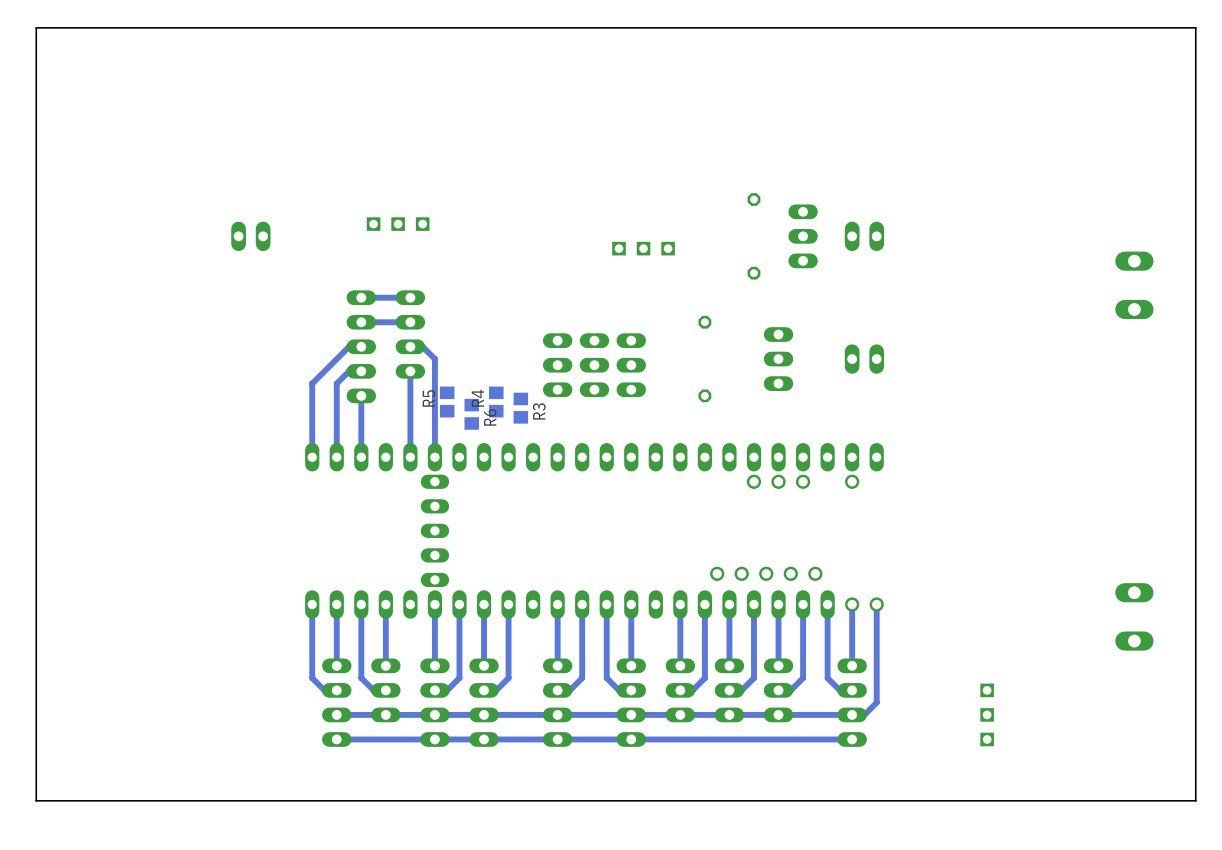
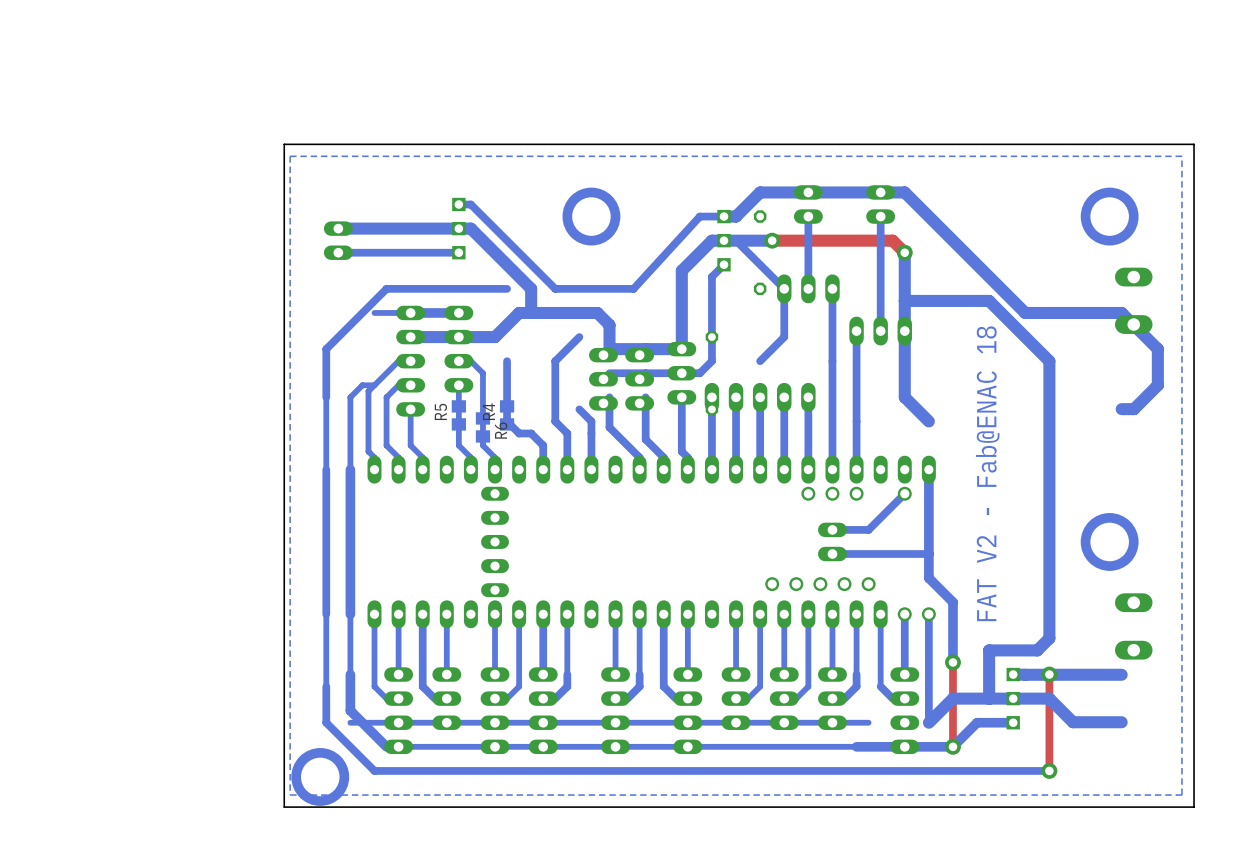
board edge: (1195, 126) (1195, 27) (36, 27) (36, 800) (269, 800) -> (1194, 144) (284, 144) (284, 807)
bottom zone outline: none -> (1181, 156) (290, 156) (290, 795) (1181, 795) (1181, 156)
drawing: none -> [562, 187, 621, 246]
drawing: none -> [1080, 187, 1139, 246]
bottom track: none -> (458, 204) (470, 204) (555, 288) (633, 288) (699, 216) (736, 216) (760, 192) (904, 192) (1025, 312) (1121, 312) (1157, 349) (1157, 385) (1134, 409) (1121, 409)
part: none -> (808, 204)
part: none -> (880, 204)
bottom track: none -> (808, 216) (808, 288)
bottom track: none -> (880, 216) (880, 331)
bottom track: none -> (338, 228) (470, 228) (531, 288) (531, 312)
part rotation: 0° (398, 224) -> 90° clockwise (458, 228)
part position: (398, 224) -> (458, 228)
bottom track: none -> (724, 240) (736, 240) (784, 288) (784, 337) (760, 361)
bottom track: none -> (772, 240) (711, 240) (681, 270) (681, 349) (609, 349) (609, 325) (597, 312) (519, 312) (495, 337) (422, 337)
top track: none -> (772, 240) (892, 240) (904, 252)
via: none -> (772, 240)
part rotation: 0° (250, 236) -> 90° clockwise (338, 240)
part position: (250, 236) -> (338, 240)
bottom track: none -> (458, 252) (338, 252)
part rotation: 0° (803, 236) -> 90° clockwise (808, 288)
part: (864, 236) -> none
bottom track: none -> (904, 252) (904, 397) (928, 421)
via: none -> (904, 252)
part rotation: 0° (643, 248) -> 90° clockwise (724, 240)
part position: (643, 248) -> (724, 240)
bottom track: none -> (724, 264) (711, 276) (711, 361) (699, 373) (609, 373)
bottom track: none -> (832, 288) (832, 469)
bottom track: none -> (904, 300) (989, 300) (1049, 361) (1049, 638) (1037, 650) (989, 650) (989, 698)
bottom track: none -> (856, 331) (856, 469)
part: none -> (880, 331)
bottom track: (398, 322) (361, 322) -> (458, 312) (422, 312)
bottom track: none -> (579, 337) (555, 361) (555, 421) (567, 433) (567, 469)
part position: (410, 334) -> (458, 349)
bottom track: (361, 346) (349, 346) (312, 383) -> (507, 288) (386, 288) (326, 349) (326, 397)
part position: (361, 346) -> (410, 361)
bottom track: (410, 346) (422, 346) (434, 359) (434, 457) -> none
bottom track: none -> (458, 361) (470, 361) (482, 373) (482, 445) (495, 457) (495, 469)
bottom track: none -> (507, 361) (507, 421) (519, 433) (531, 433) (543, 445) (543, 469)
part: none -> (681, 373)
part: (778, 359) -> none
part: (864, 359) -> none
part: (557, 365) -> none
bottom track: none -> (410, 385) (398, 385) (386, 397) (386, 445) (398, 457) (398, 469)
bottom track: (410, 371) (410, 444) -> (410, 409) (410, 445) (422, 457)
bottom track: none -> (458, 385) (458, 445) (470, 457) (470, 469)
bottom track: none -> (609, 397) (609, 427) (639, 457) (639, 469)
bottom track: none -> (645, 397) (645, 439) (663, 457) (663, 469)
bottom track: none -> (681, 397) (681, 451) (687, 457) (687, 469)
bottom track: none -> (711, 397) (711, 469)
bottom track: none -> (736, 397) (736, 469)
bottom track: none -> (760, 397) (760, 469)
part: none -> (760, 397)
bottom track: none -> (784, 397) (784, 469)
bottom track: none -> (808, 397) (808, 469)
bottom track: (361, 395) (361, 444) -> (410, 361) (398, 361) (368, 391) (368, 451) (374, 457)
bottom track: none -> (579, 409) (591, 421) (591, 469)
R3: (520, 408) -> none
bottom track: none -> (326, 469) (326, 614)
bottom track: none -> (350, 469) (350, 614)
bottom track: none -> (928, 469) (928, 578) (952, 602) (952, 662)
text: none -> FAT V2 - Fab@ENAC 18 (987, 473)
bottom track: none -> (904, 493) (868, 529) (832, 529)
drawing: none -> [1080, 513, 1139, 571]
part position: (594, 530) -> (651, 541)
part: none -> (832, 541)
bottom track: none -> (928, 554) (832, 554)
bottom track: (459, 604) (459, 678) (447, 690) (434, 690) -> (422, 614) (422, 686) (434, 698) (446, 698)
bottom track: none -> (543, 614) (543, 674)
bottom track: (582, 604) (582, 678) (569, 690) (557, 690) -> none
bottom track: (704, 604) (704, 678) (692, 690) (680, 690) -> (663, 614) (663, 686) (675, 698) (687, 698)
bottom track: none -> (904, 614) (904, 674)
bottom track: none -> (928, 614) (928, 722) (952, 698) (1049, 698) (1073, 722) (1121, 722)
top track: none -> (952, 662) (952, 746)
via: none -> (952, 662)
bottom track: none -> (567, 674) (567, 686) (555, 698) (543, 698)
bottom track: (606, 665) (606, 678) (619, 690) (631, 690) -> none
bottom track: none -> (639, 674) (639, 686) (627, 698) (615, 698)
bottom track: (827, 665) (827, 678) (839, 690) (852, 690) -> none
bottom track: none -> (856, 674) (856, 686) (844, 698) (832, 698)
bottom track: none -> (1013, 674) (1121, 674)
top track: none -> (1049, 674) (1049, 770)
via: none -> (1049, 674)
bottom track: (312, 678) (324, 690) (336, 690) -> (326, 686) (326, 722) (374, 770) (1049, 770)
bottom track: (876, 678) (876, 702) (864, 714) -> (880, 686) (892, 698) (904, 698)
part position: (385, 690) -> (446, 698)
part: (680, 690) -> none
part: none -> (832, 698)
part: (336, 702) -> none
part: none -> (398, 710)
part: (434, 702) -> none
part: none -> (543, 710)
part: (557, 702) -> none
part: none -> (615, 710)
part: (631, 702) -> none
part: none -> (687, 710)
part position: (852, 702) -> (904, 710)
part position: (987, 714) -> (1013, 698)
bottom track: none -> (1013, 722) (977, 722) (952, 746) (856, 746)
bottom track: (373, 739) (336, 739) -> (386, 746) (350, 710) (350, 674)
via: none -> (952, 746)
drawing: none -> [291, 748, 350, 806]
via: none -> (1049, 770)

